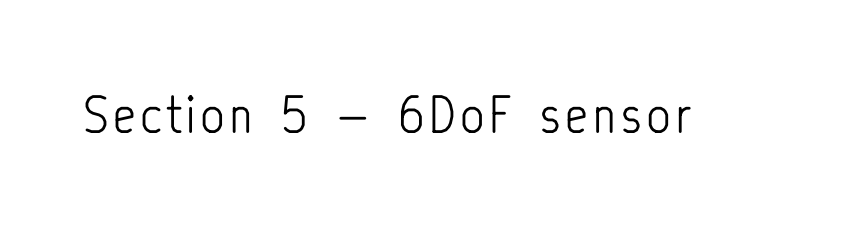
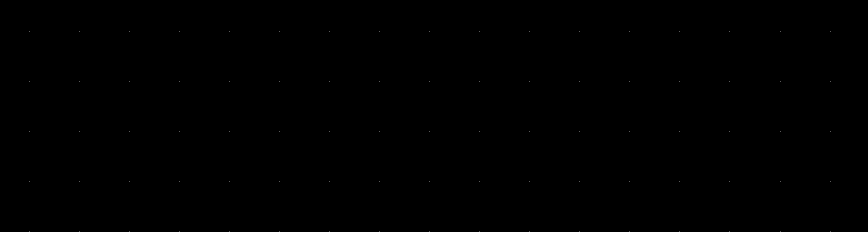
text: Section 5 - 6DoF sensor (388, 114) -> none

